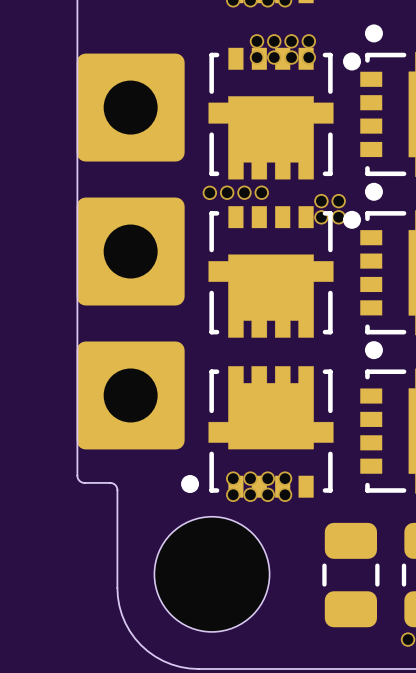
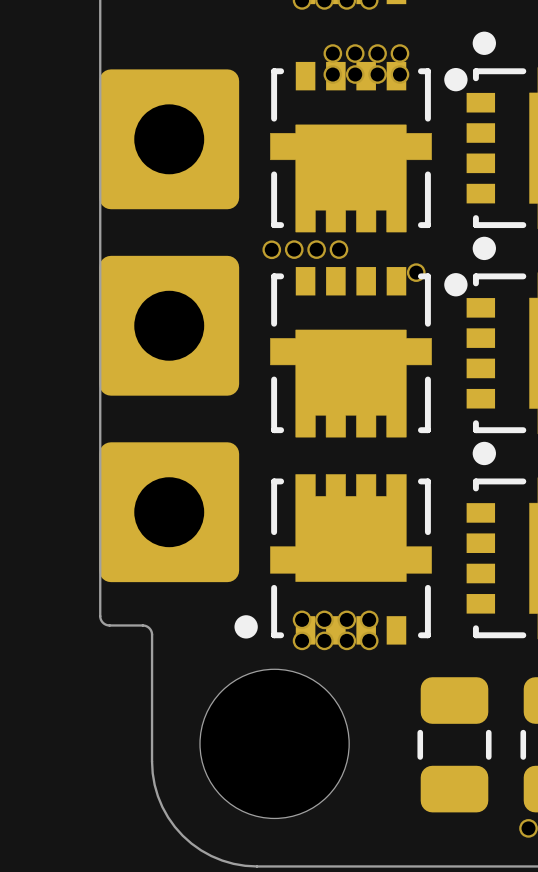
via: (321, 201) -> none
via: (338, 201) -> none
via: none -> (416, 272)
via: (321, 217) -> none
via: (338, 217) -> none

